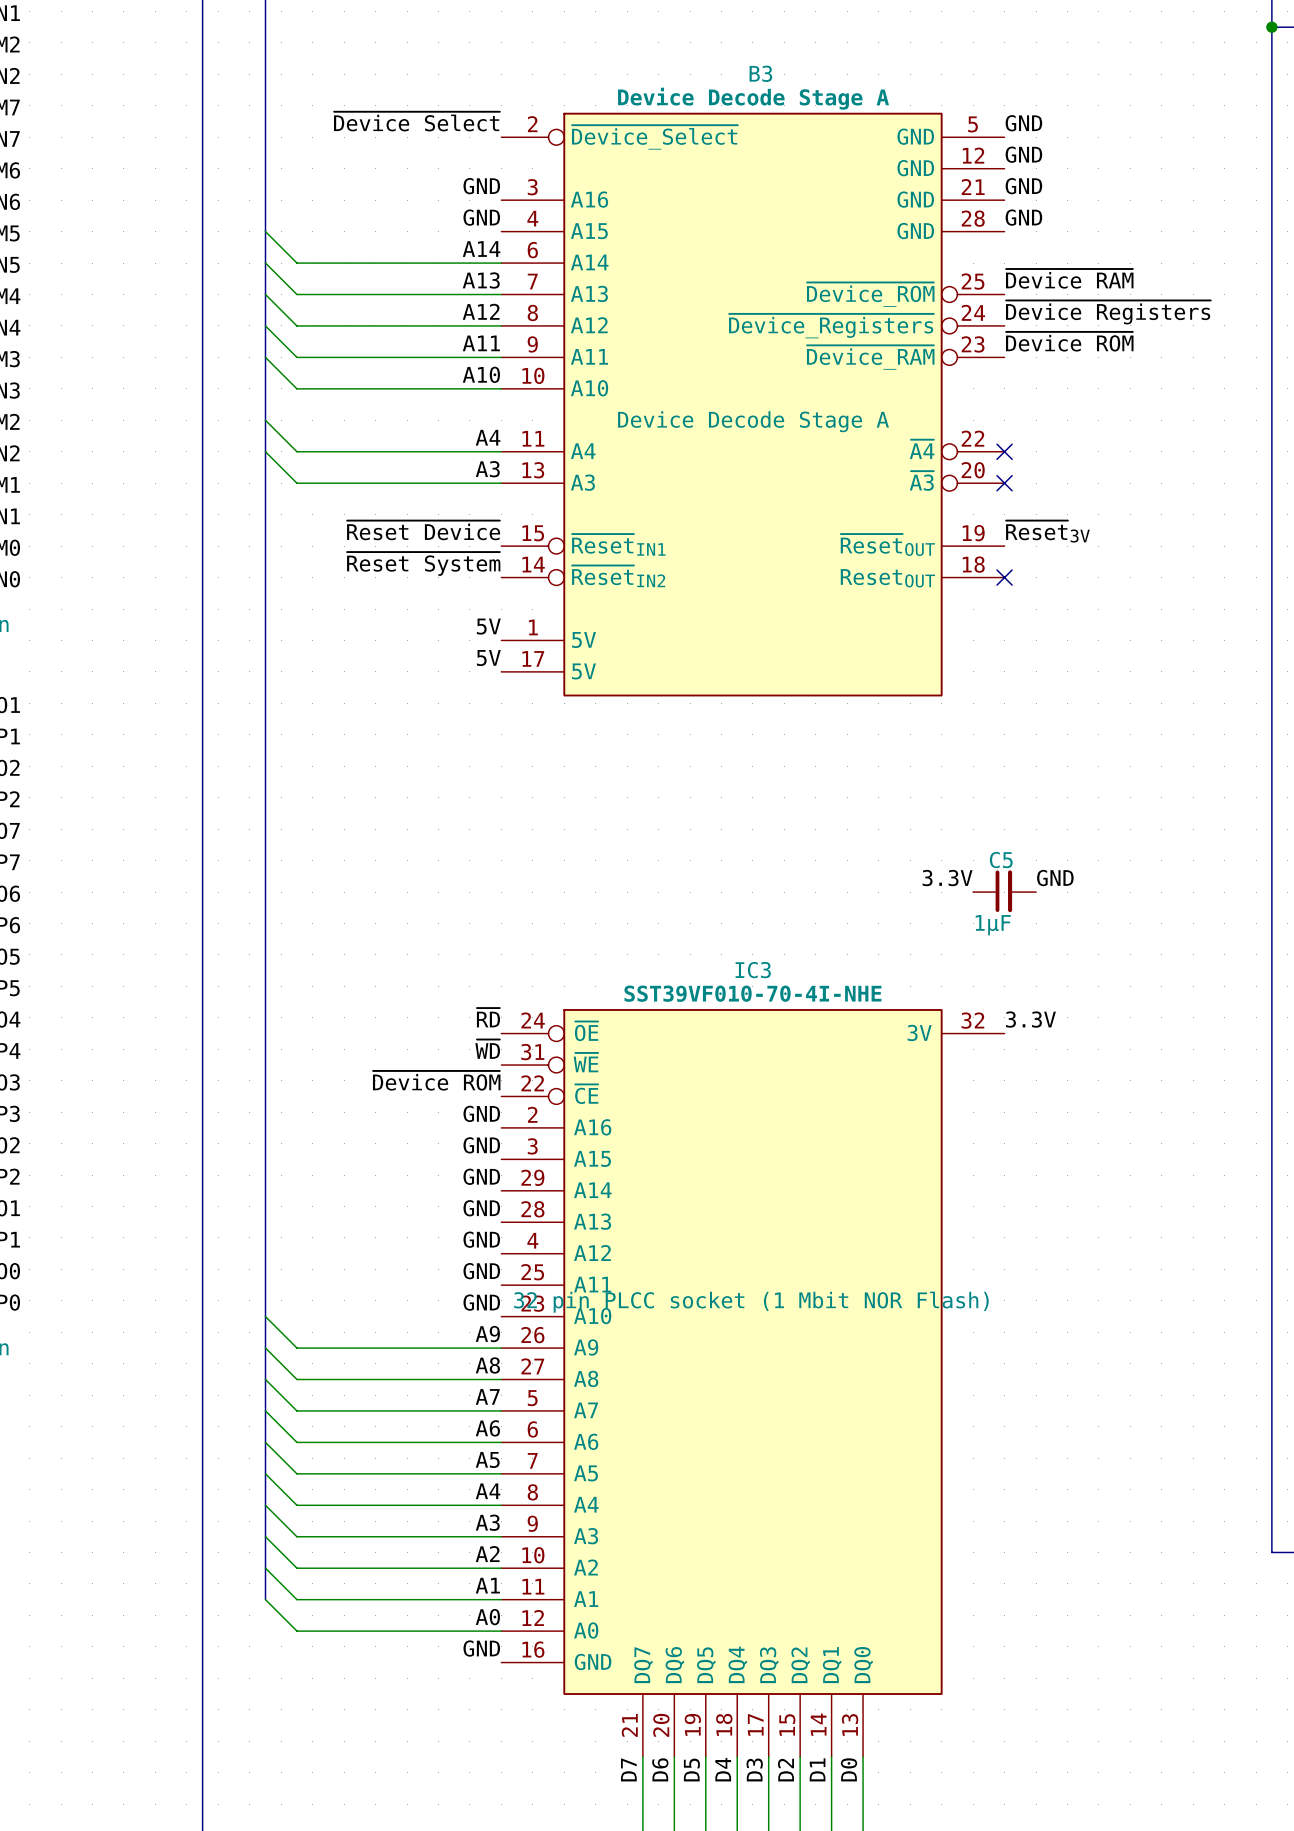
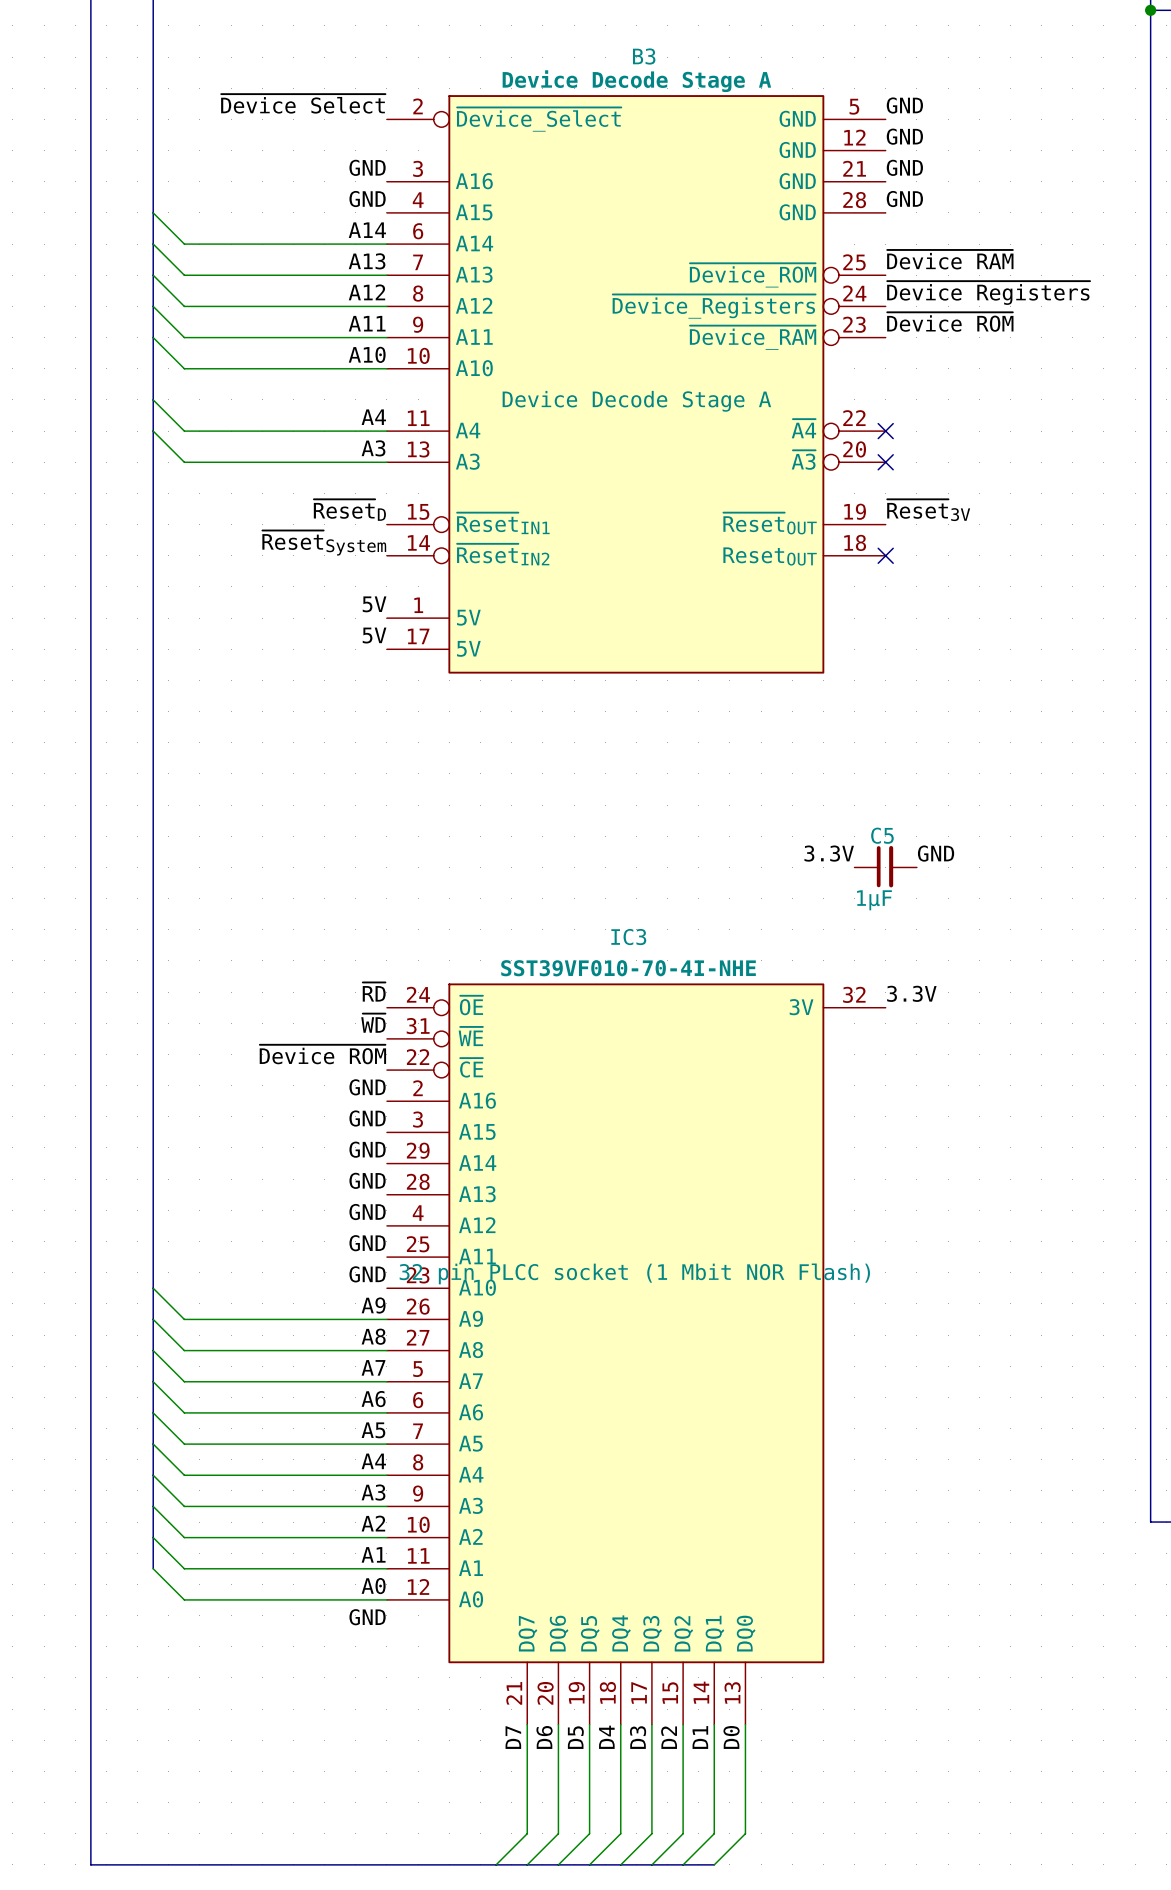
label: ~{Reset Device} (423, 530) -> ~{Reset}D (349, 510)
label: ~{Reset System} (423, 563) -> ~{Reset}System (324, 543)
IC3 symbol: [501, 1009, 1005, 1757] -> [386, 983, 886, 1725]

